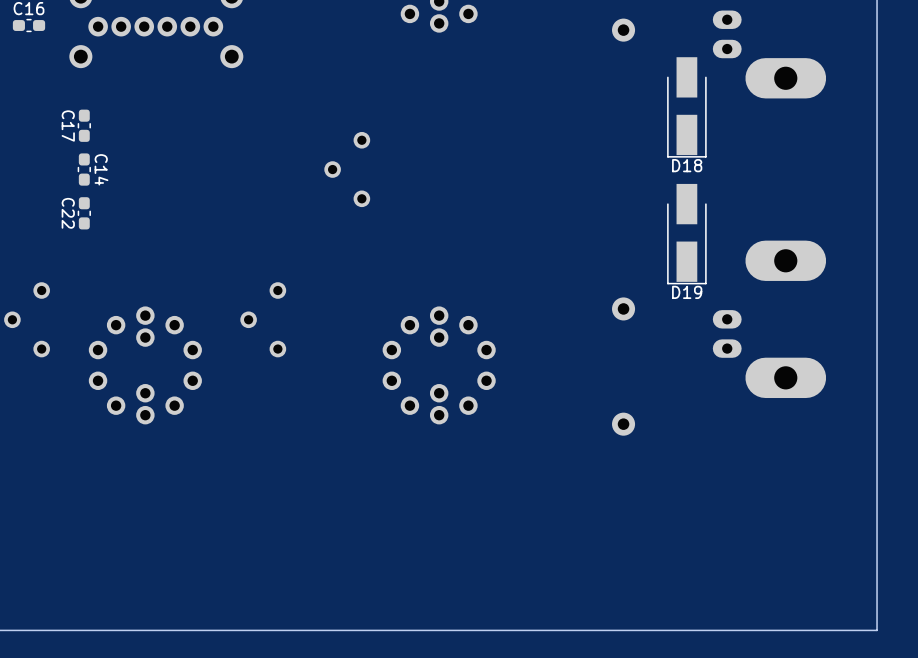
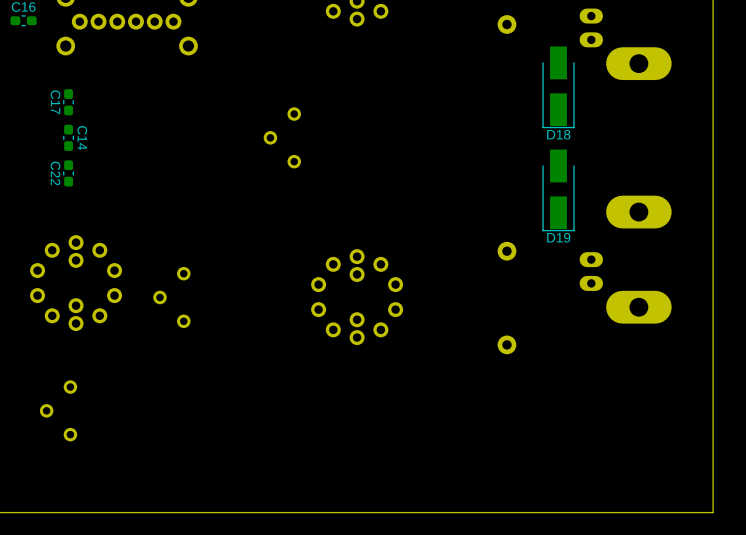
part: (27, 319) -> none
part position: (263, 319) -> (171, 297)
part position: (145, 365) -> (76, 283)
part: none -> (58, 410)

